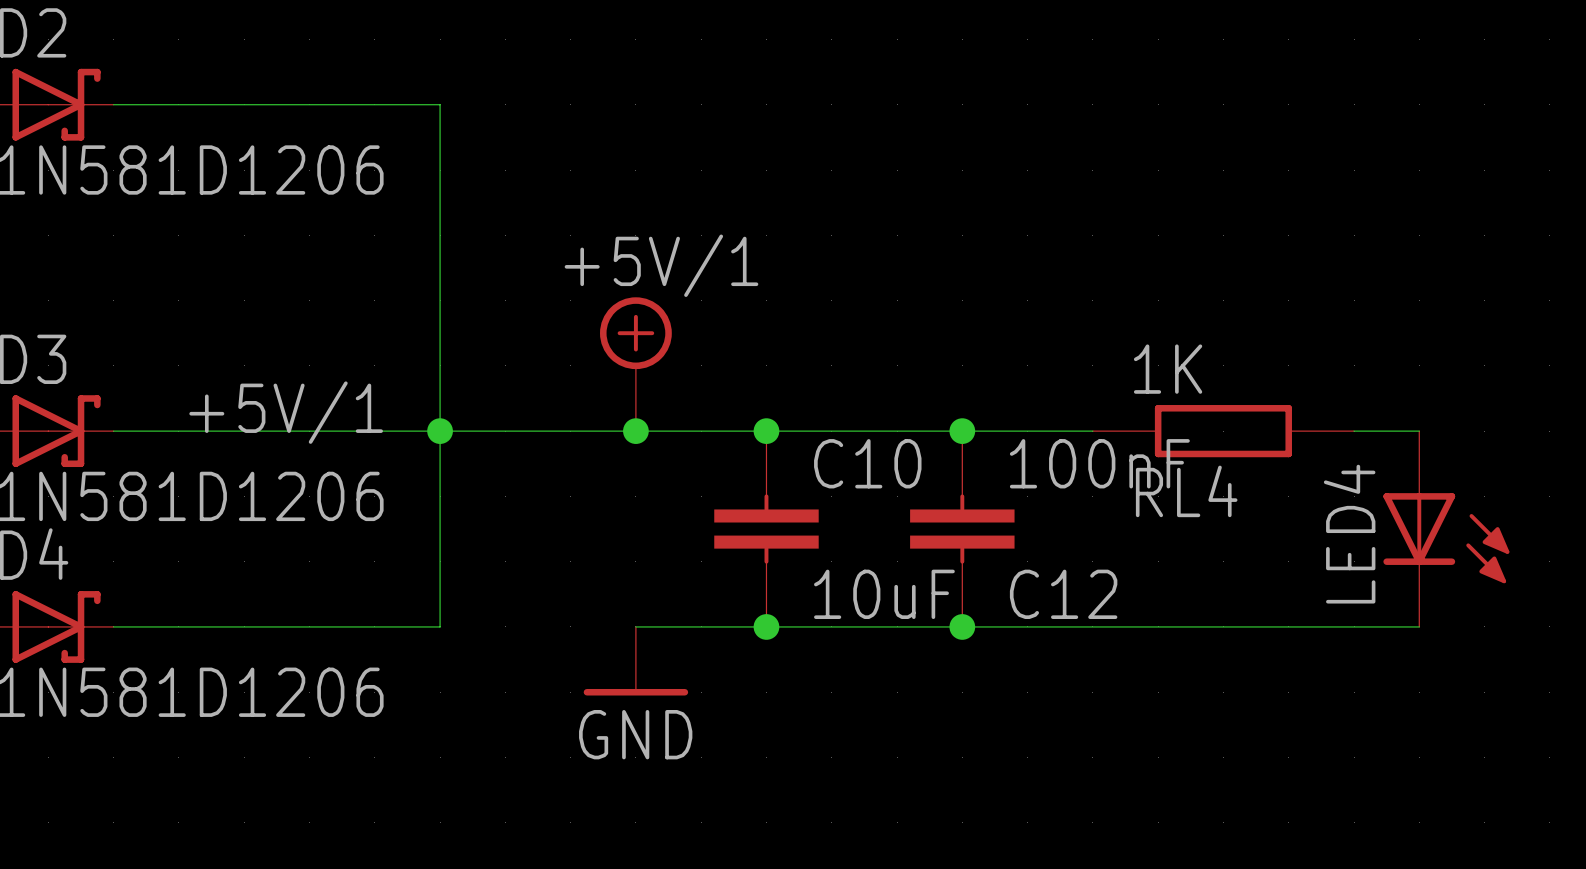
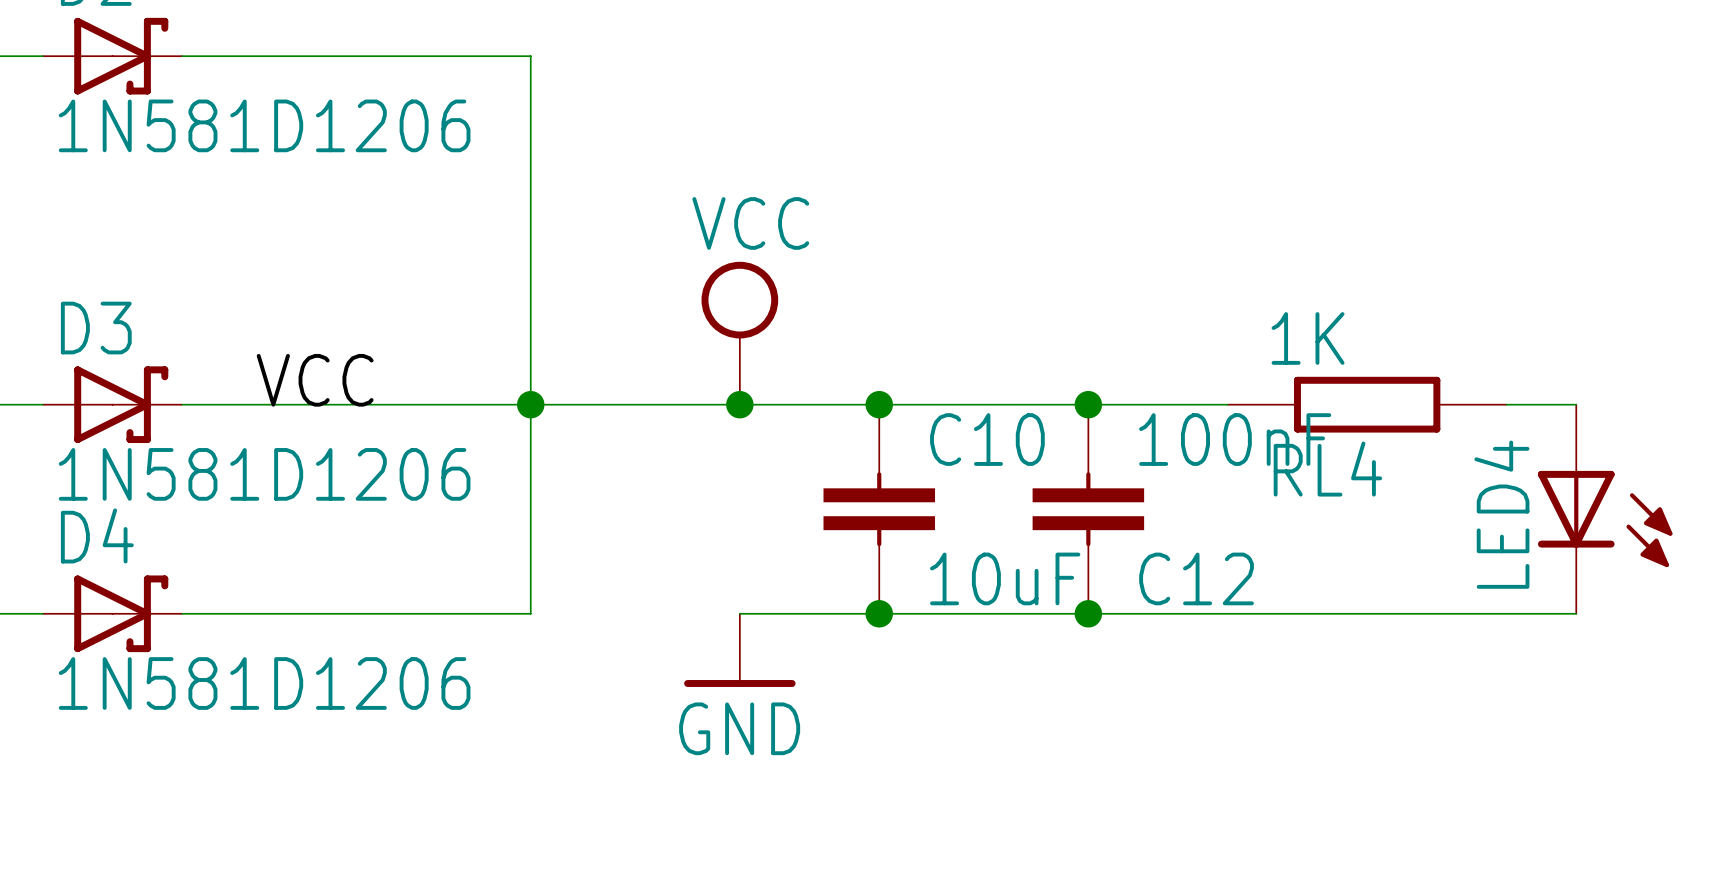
power symbol: +5V/1 (635, 364) -> VCC (739, 333)
label: +5V/1 (286, 412) -> VCC (315, 380)

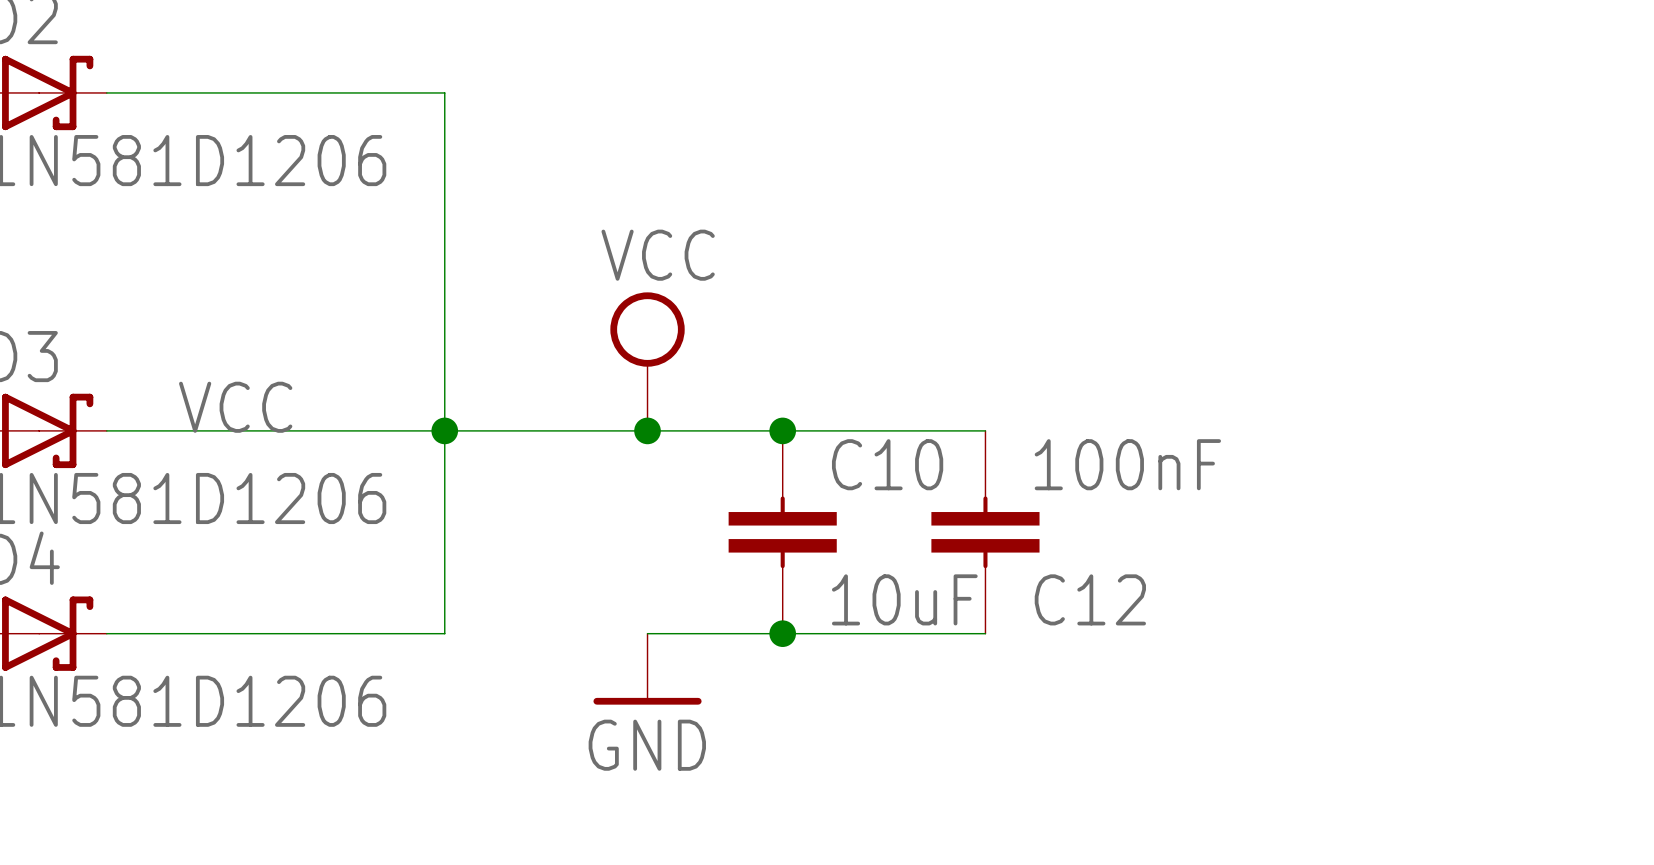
wire: (1088, 404) (1227, 404) -> none
junction: (1088, 404) -> none
RL4: 1K (1367, 404) -> none
wire: (1506, 404) (1576, 404) -> none
LED4: (1605, 509) -> none
wire: (1088, 613) (1576, 613) -> none
junction: (1088, 613) -> none

